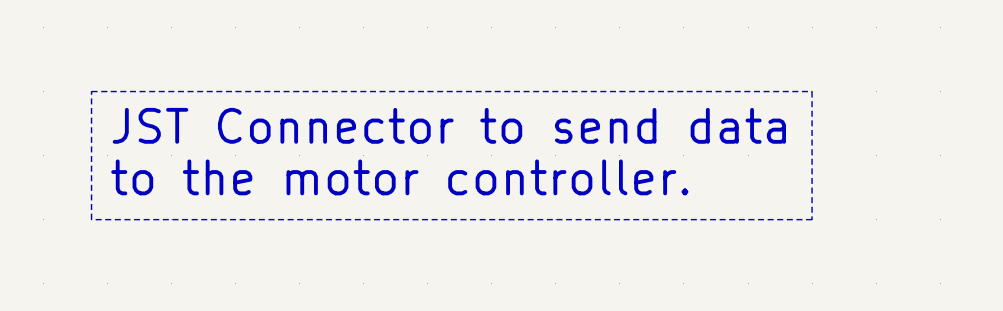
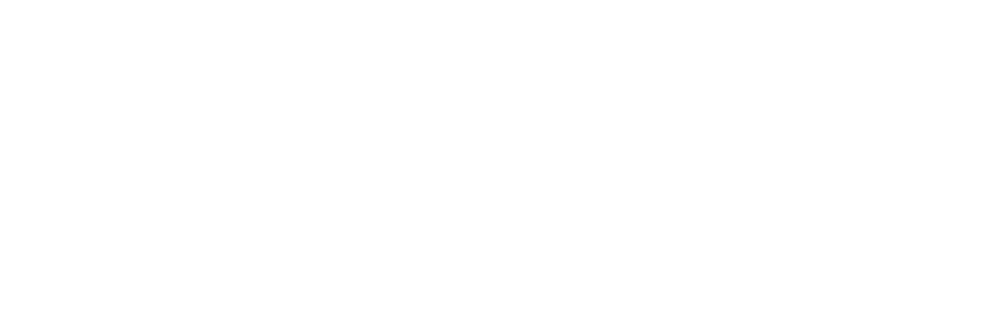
line: (91, 91) (91, 219) (812, 219) (812, 91) (91, 91) -> none
text: JST Connector to send data (449, 125) -> none
text: to the motor controller. (399, 177) -> none

